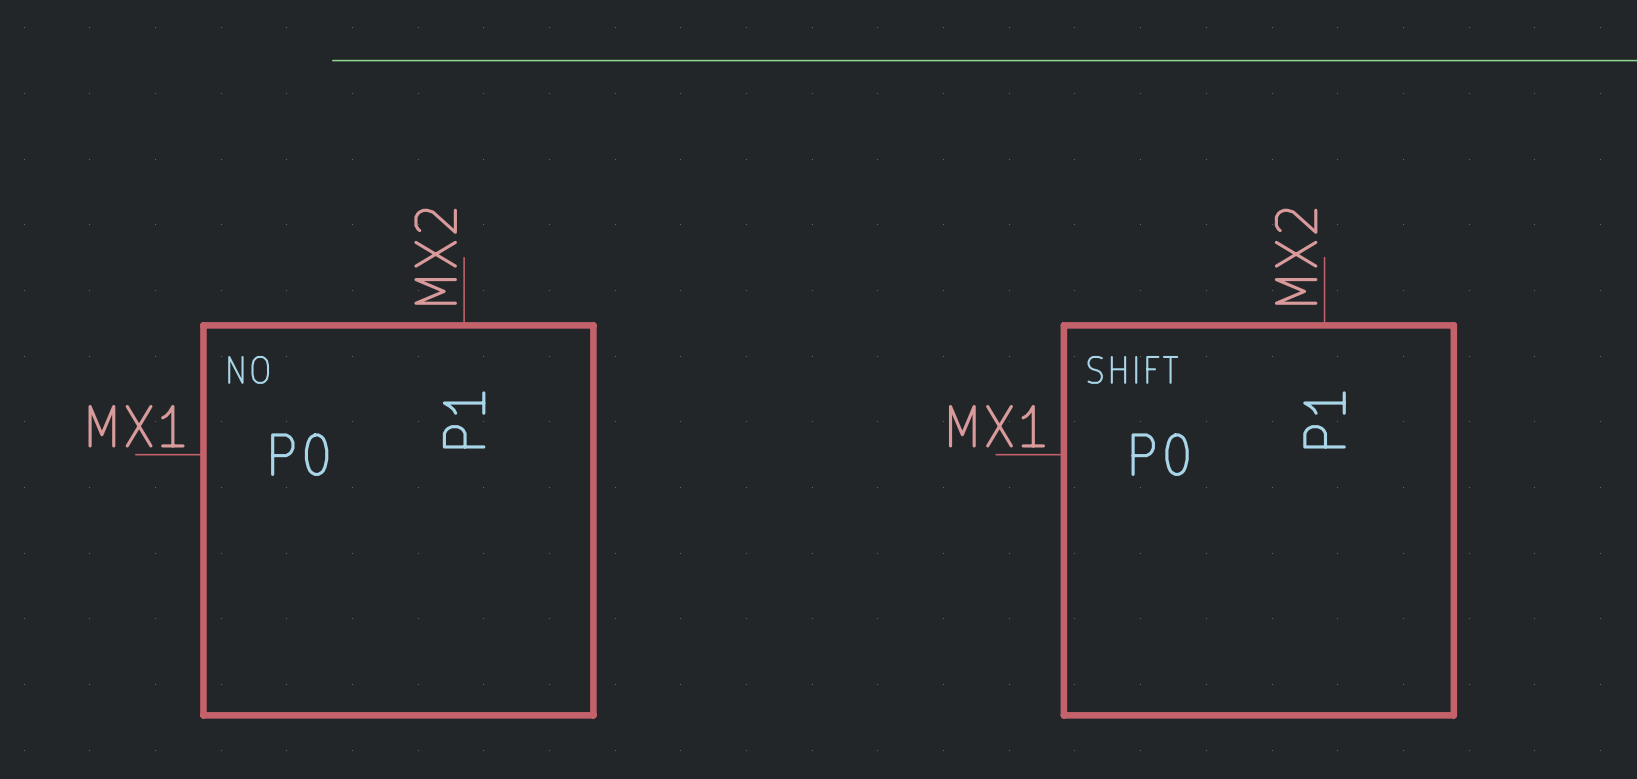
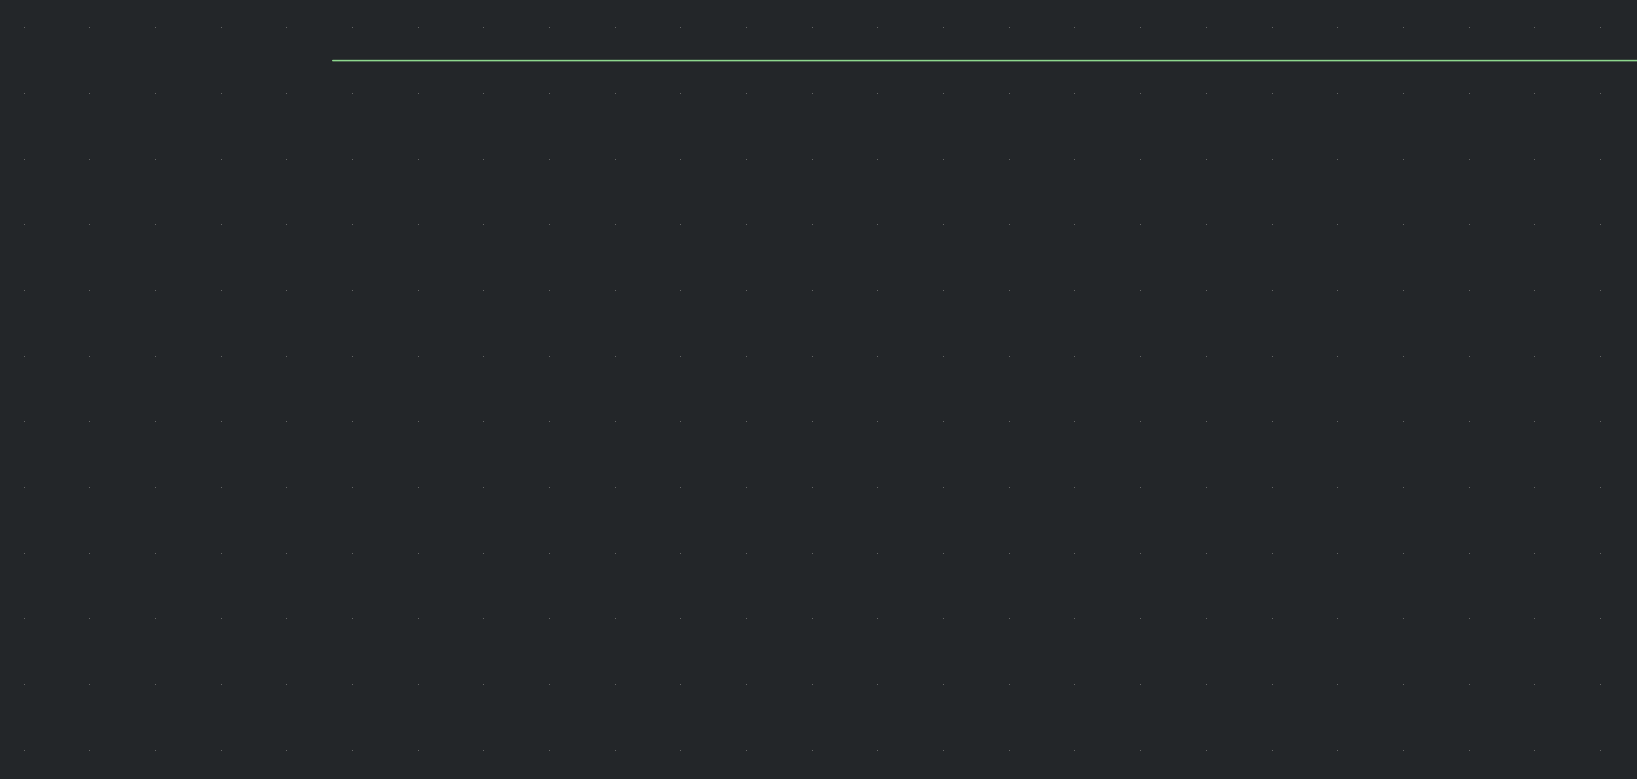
NO: (366, 488) -> none
SHIFT: (1226, 488) -> none

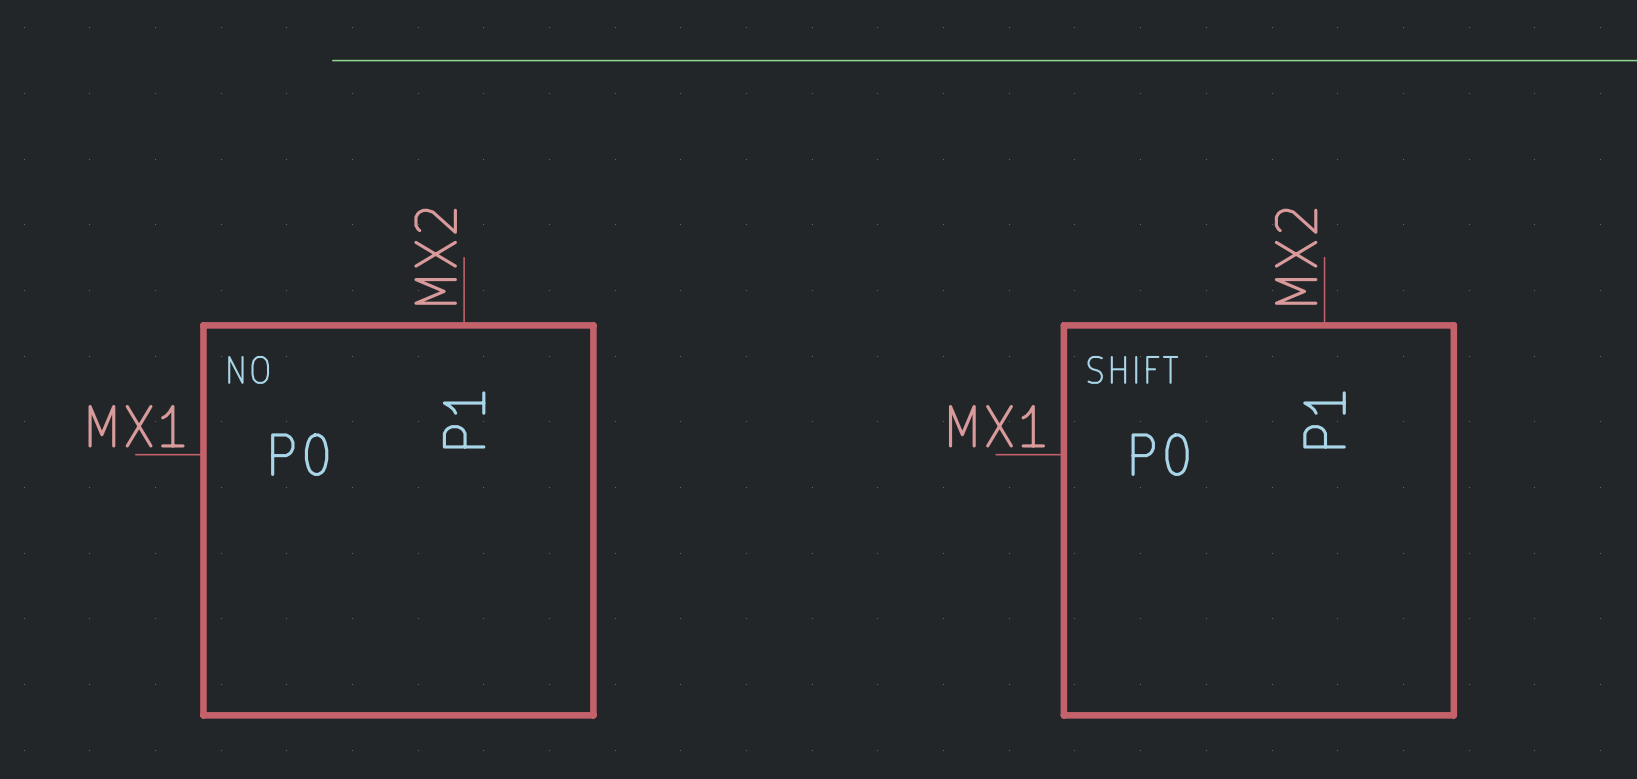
NO: none -> (366, 488)
SHIFT: none -> (1226, 488)

